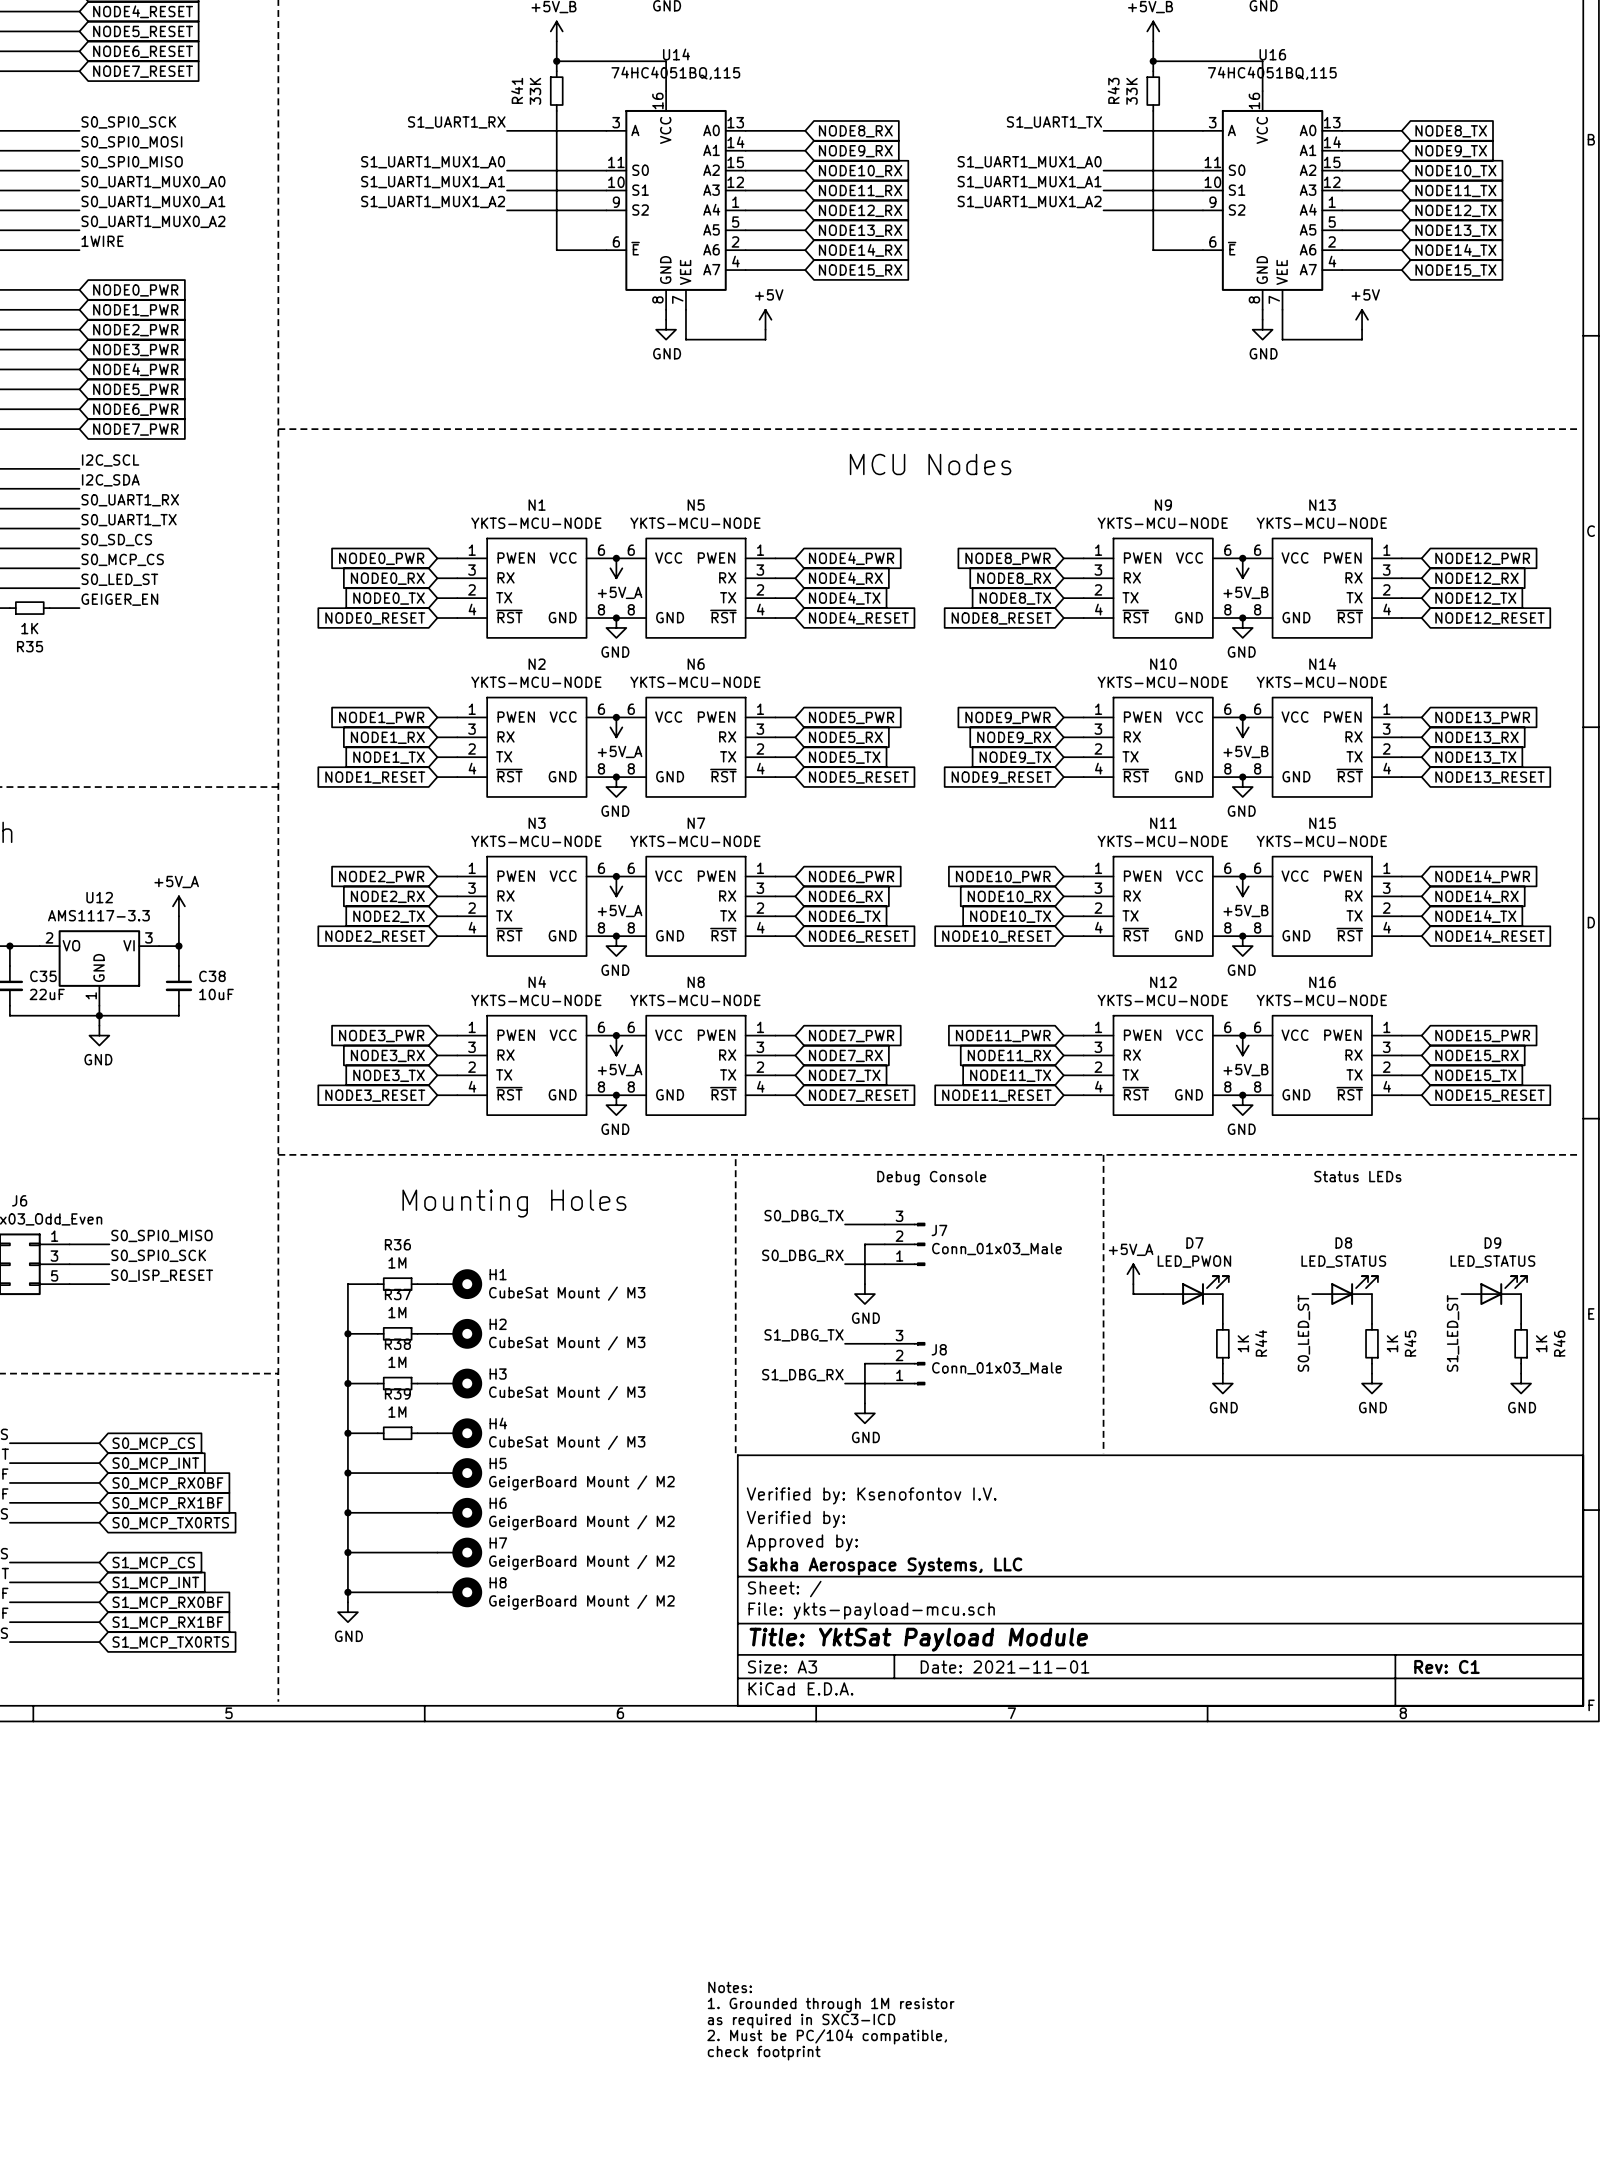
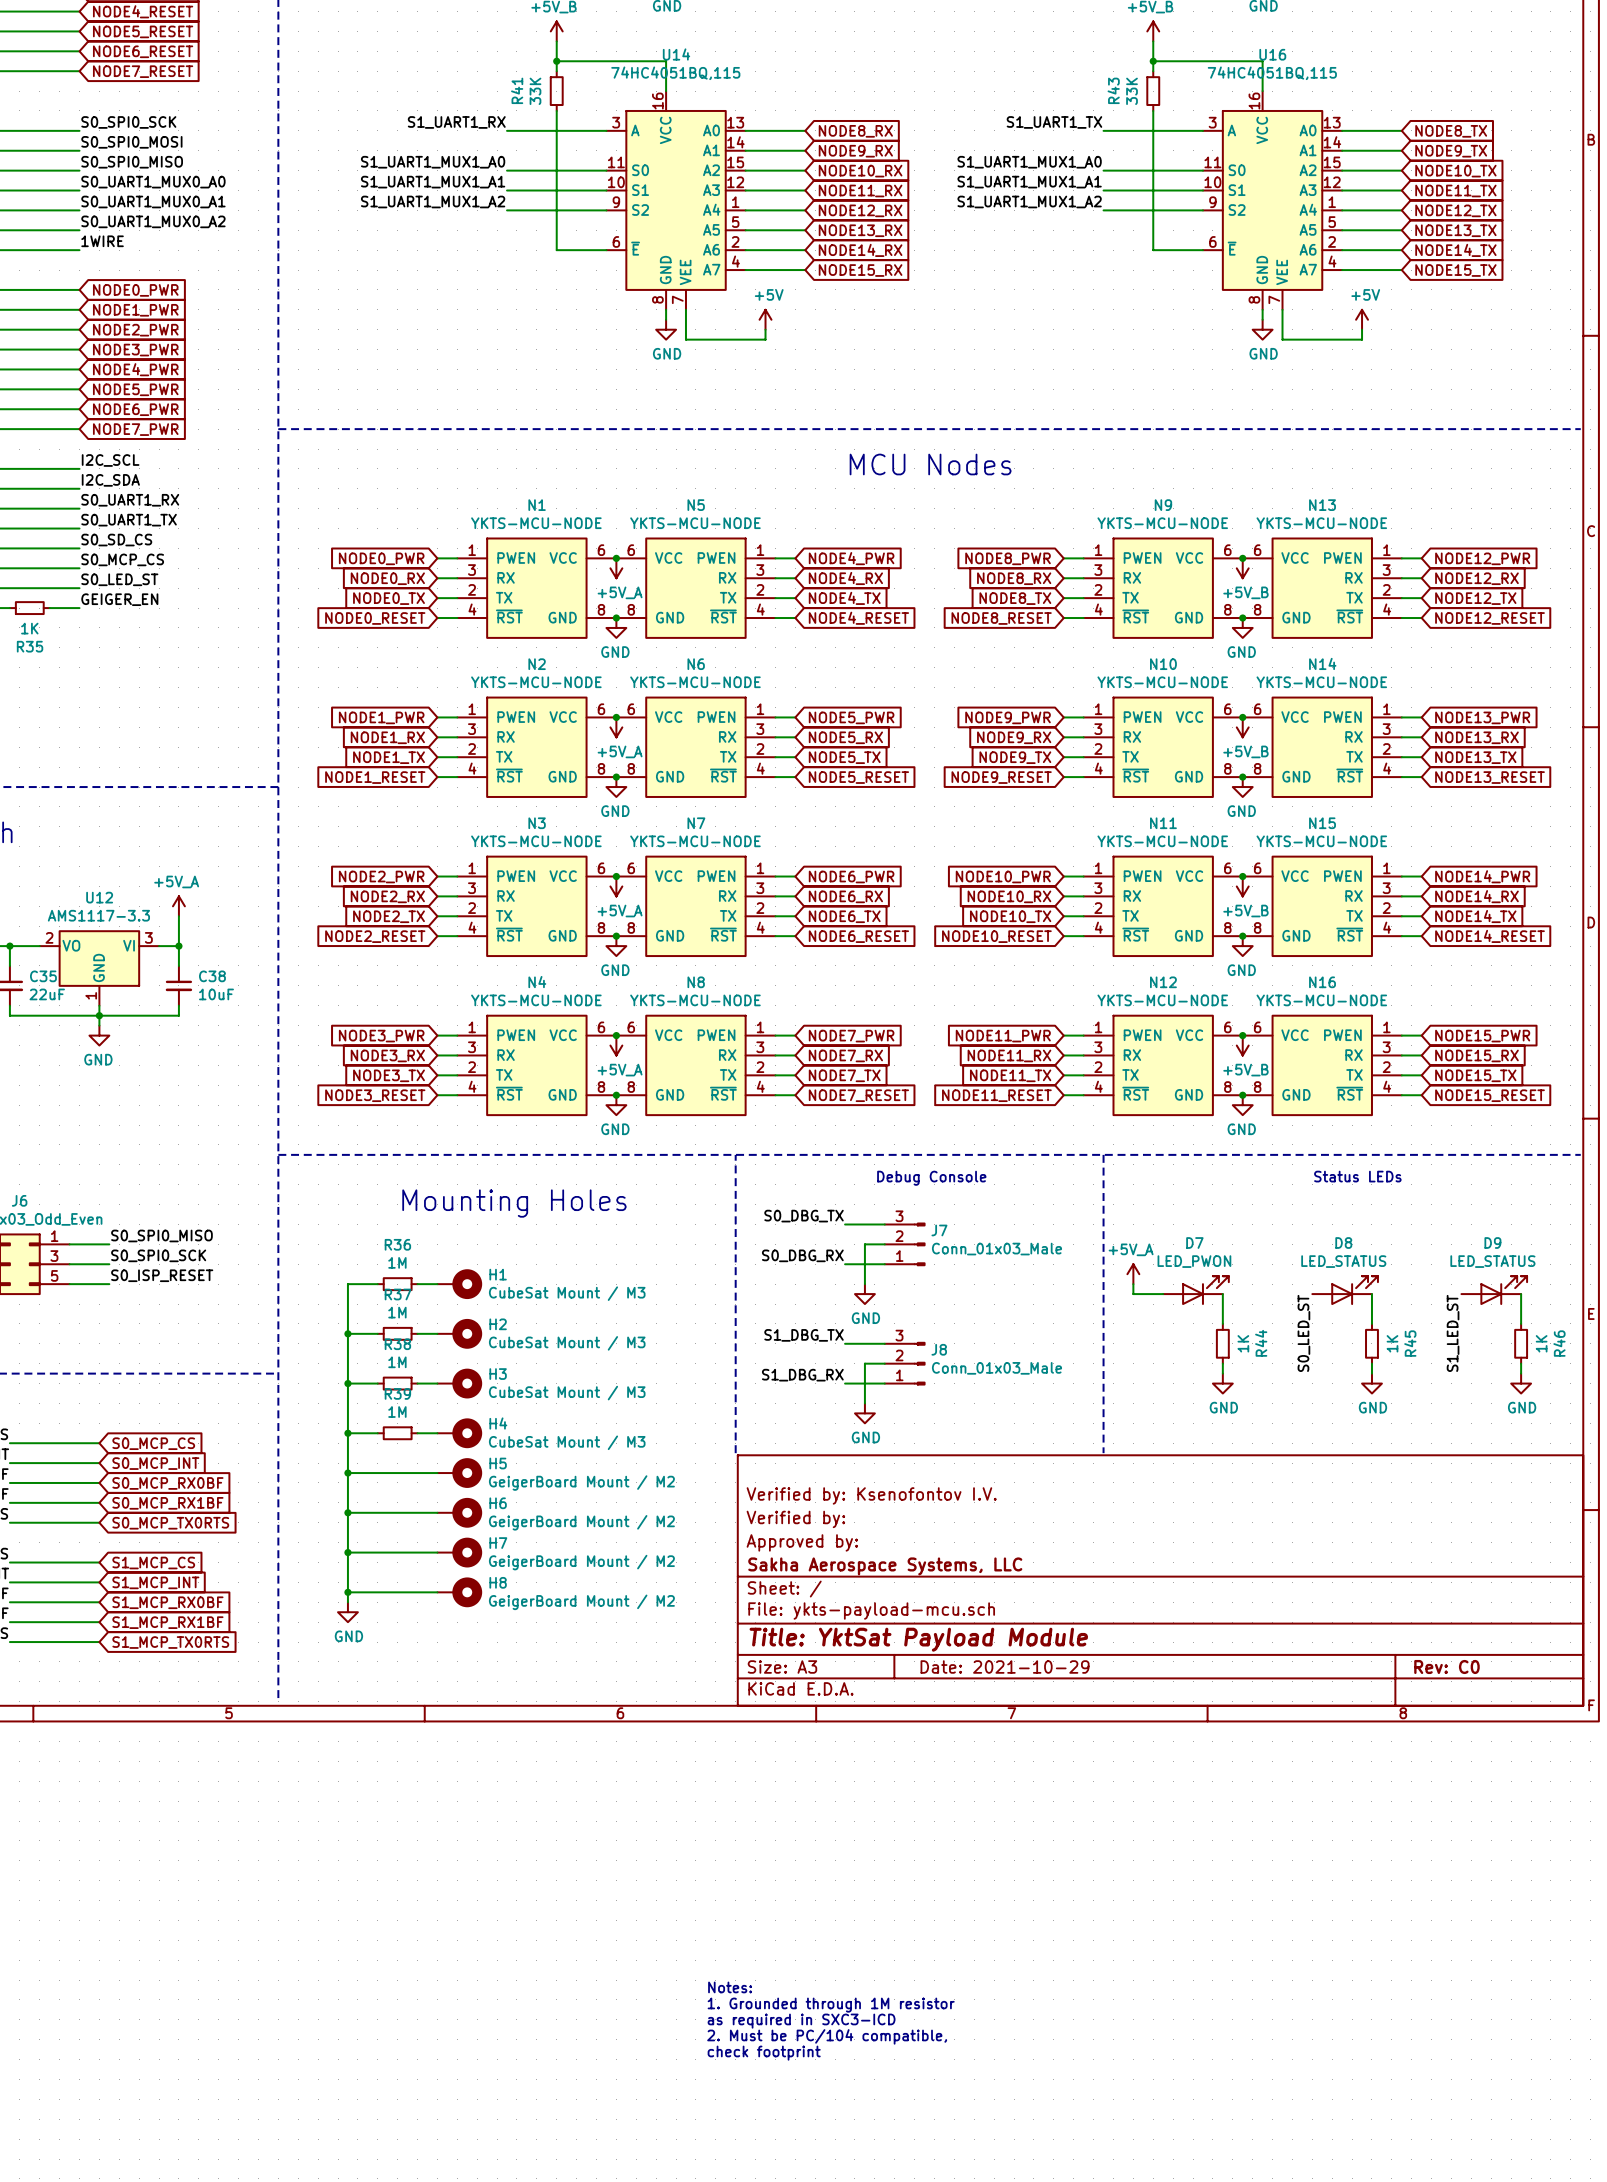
title block: Date: 2021-11-01 (1005, 1666) -> Date: 2021-10-29 (1005, 1666)
title block: Rev: C1 (1446, 1666) -> Rev: C0 (1446, 1666)

